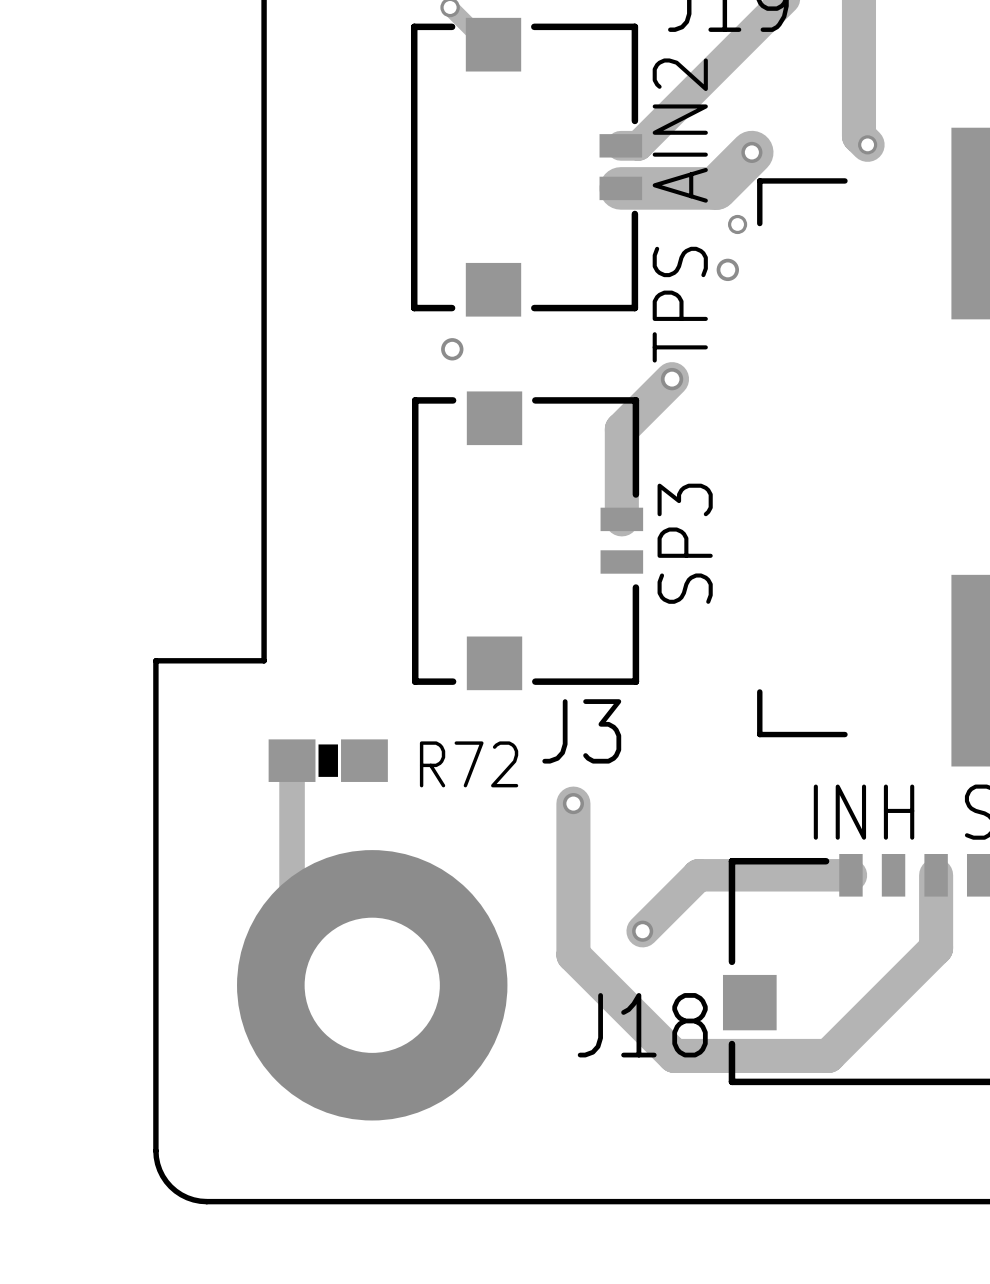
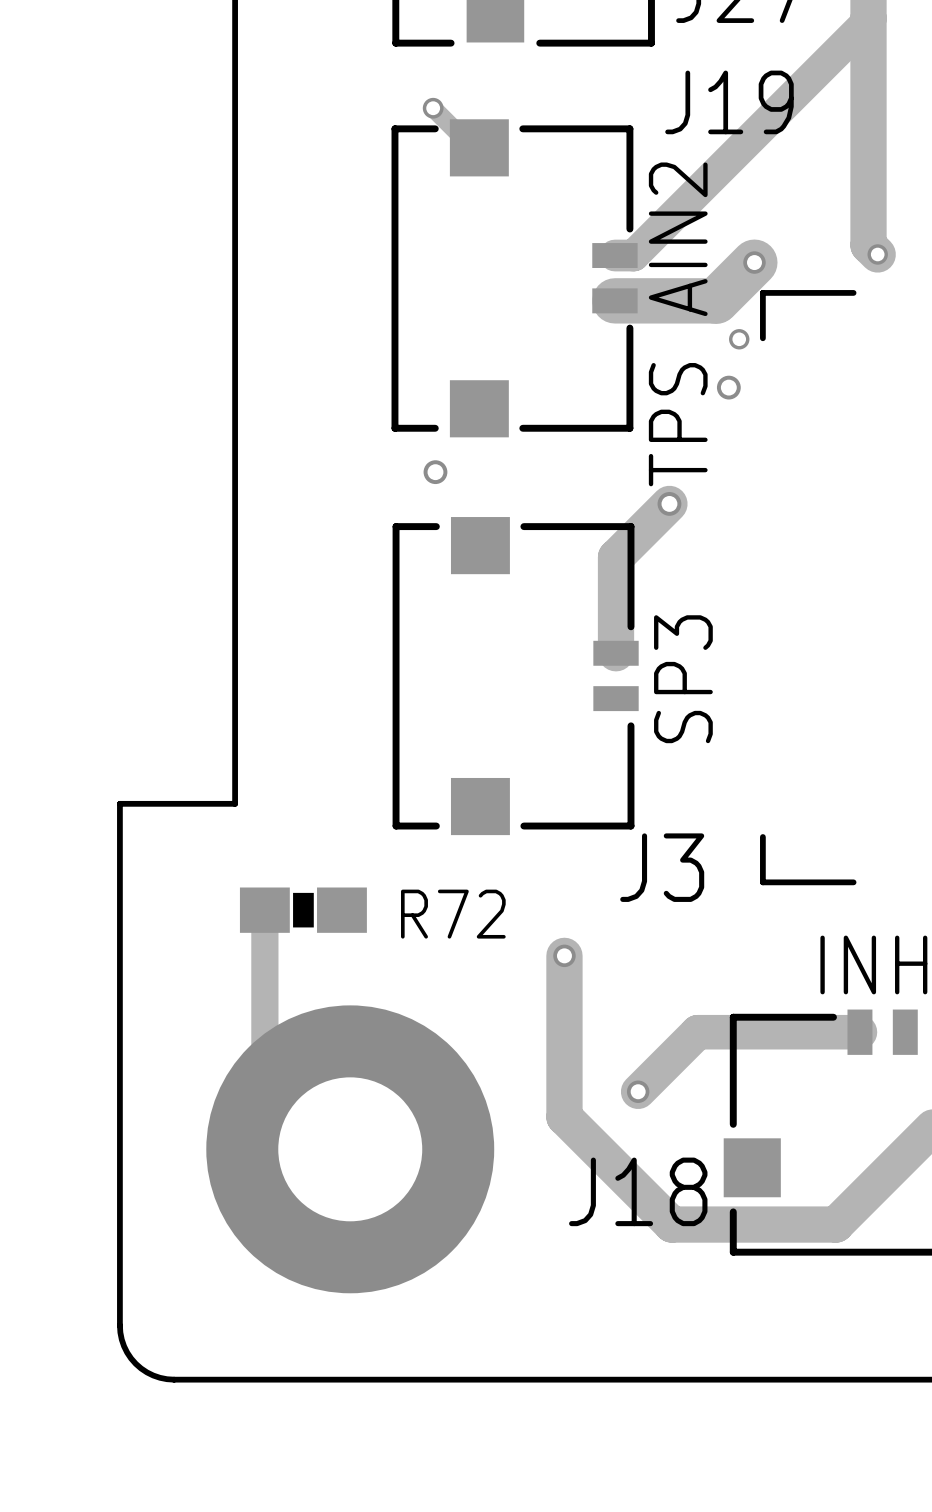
J3 name position: J3 (581, 731) -> J3 (662, 867)

